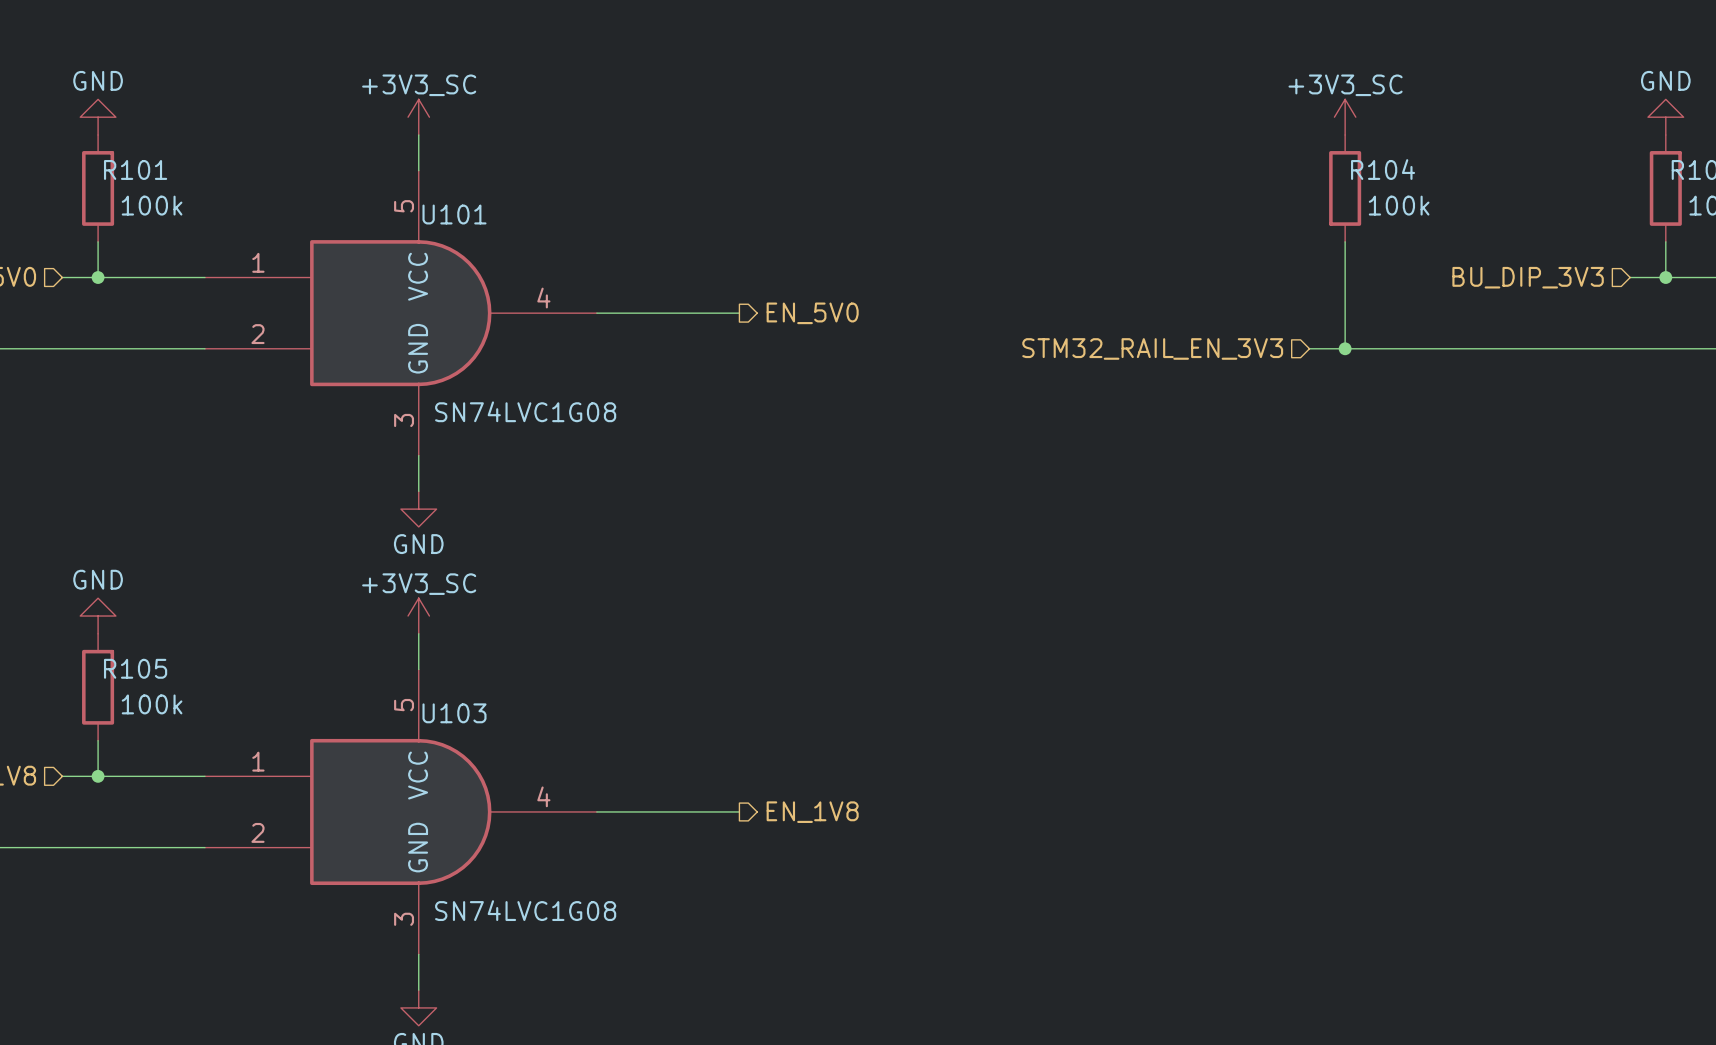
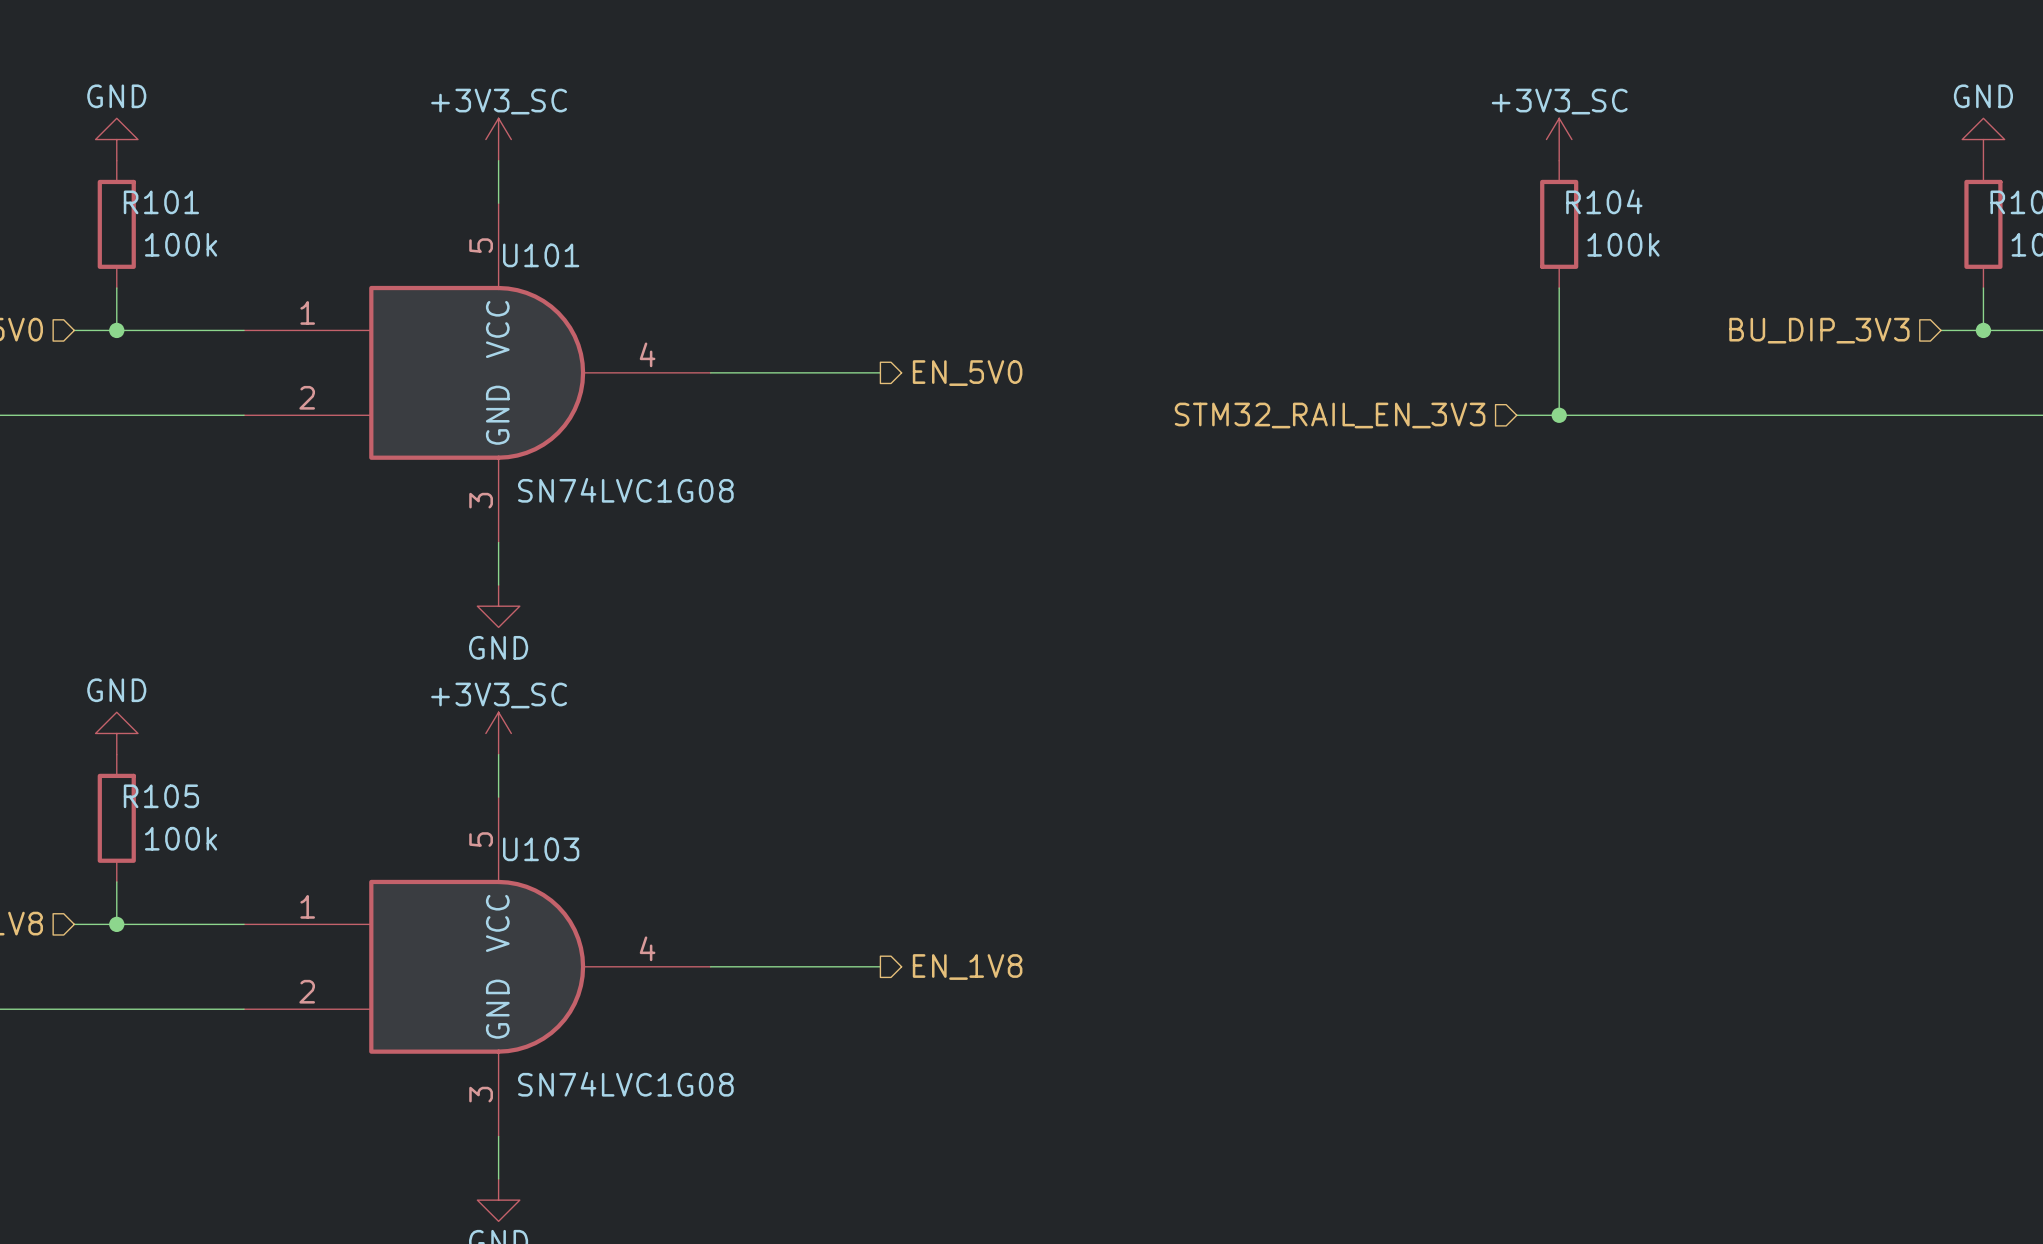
power symbol position: +3V3_SC (1345, 117) -> +3V3_SC (1559, 139)
R104 position: (1345, 188) -> (1559, 224)
wire: none -> (1559, 288) (1559, 415) (1516, 415)
wire: (1345, 241) (1345, 348) -> none
hierarchical label position: STM32_RAIL_EN_3V3 (1152, 348) -> STM32_RAIL_EN_3V3 (1330, 415)
junction position: (1345, 348) -> (1559, 415)

